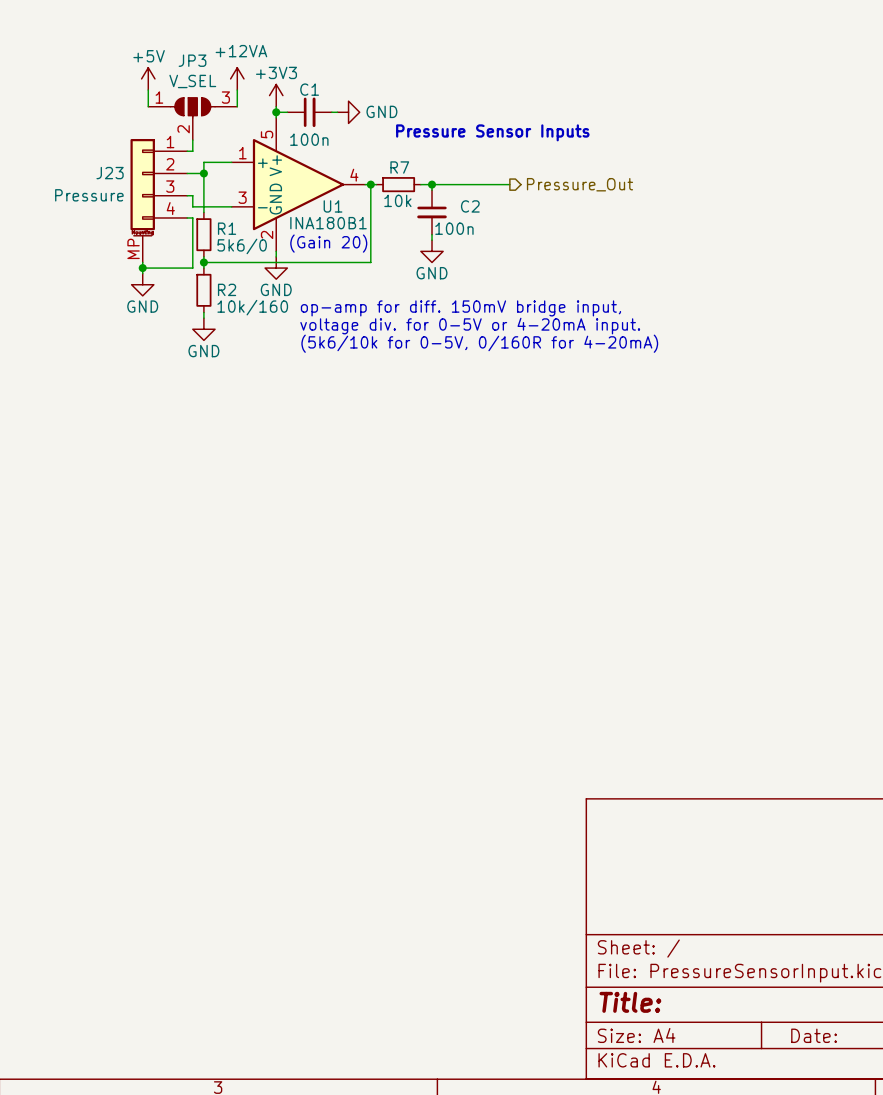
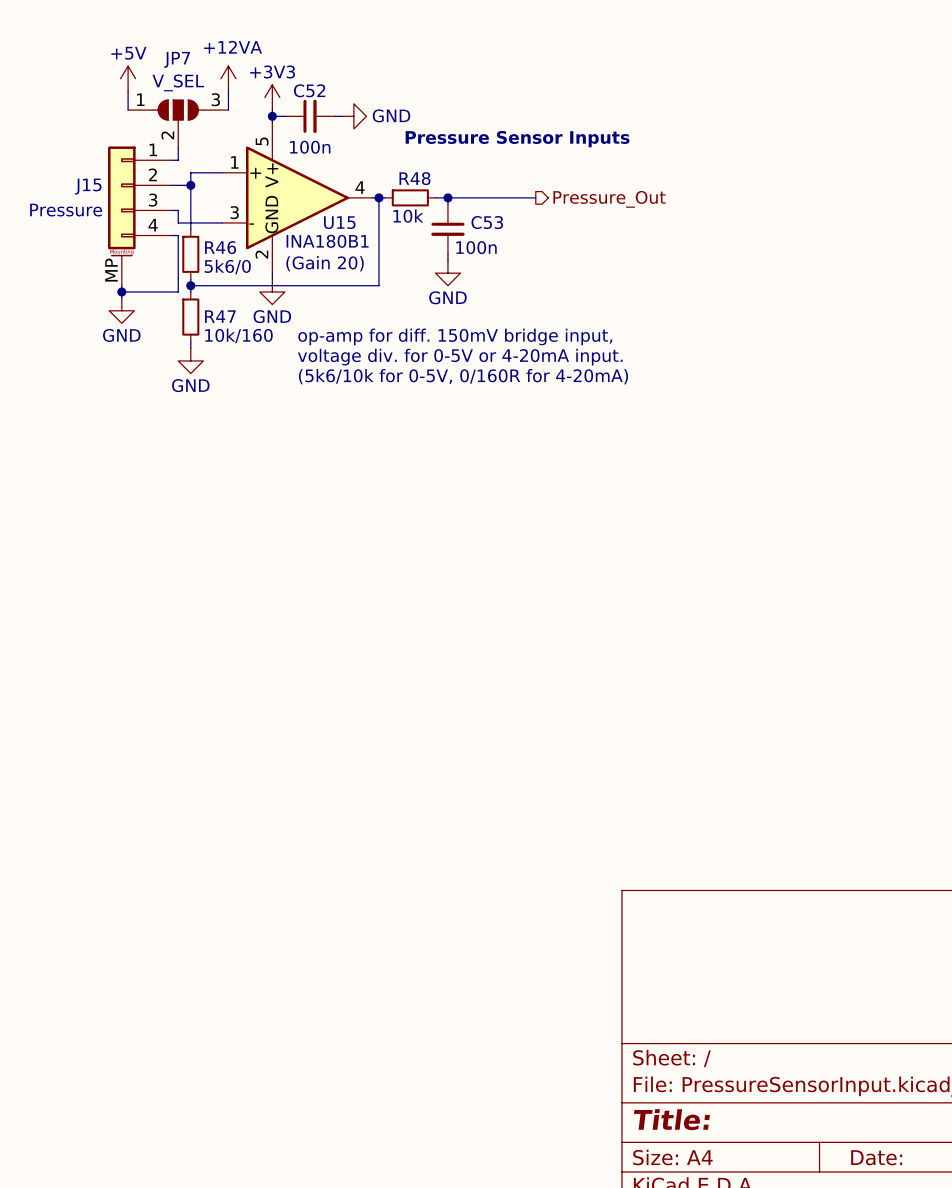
JP3 name: JP3 (192, 60) -> JP7 (177, 59)
C1 name: C1 (309, 89) -> C52 (309, 90)
R7 name: R7 (399, 167) -> R48 (414, 178)
J23 name: J23 (110, 173) -> J15 (88, 186)
U1 name: U1 (333, 206) -> U15 (339, 222)
C2 name: C2 (470, 206) -> C53 (487, 222)
R1 name: R1 (227, 228) -> R46 (220, 247)
R2 name: R2 (227, 289) -> R47 (220, 316)

